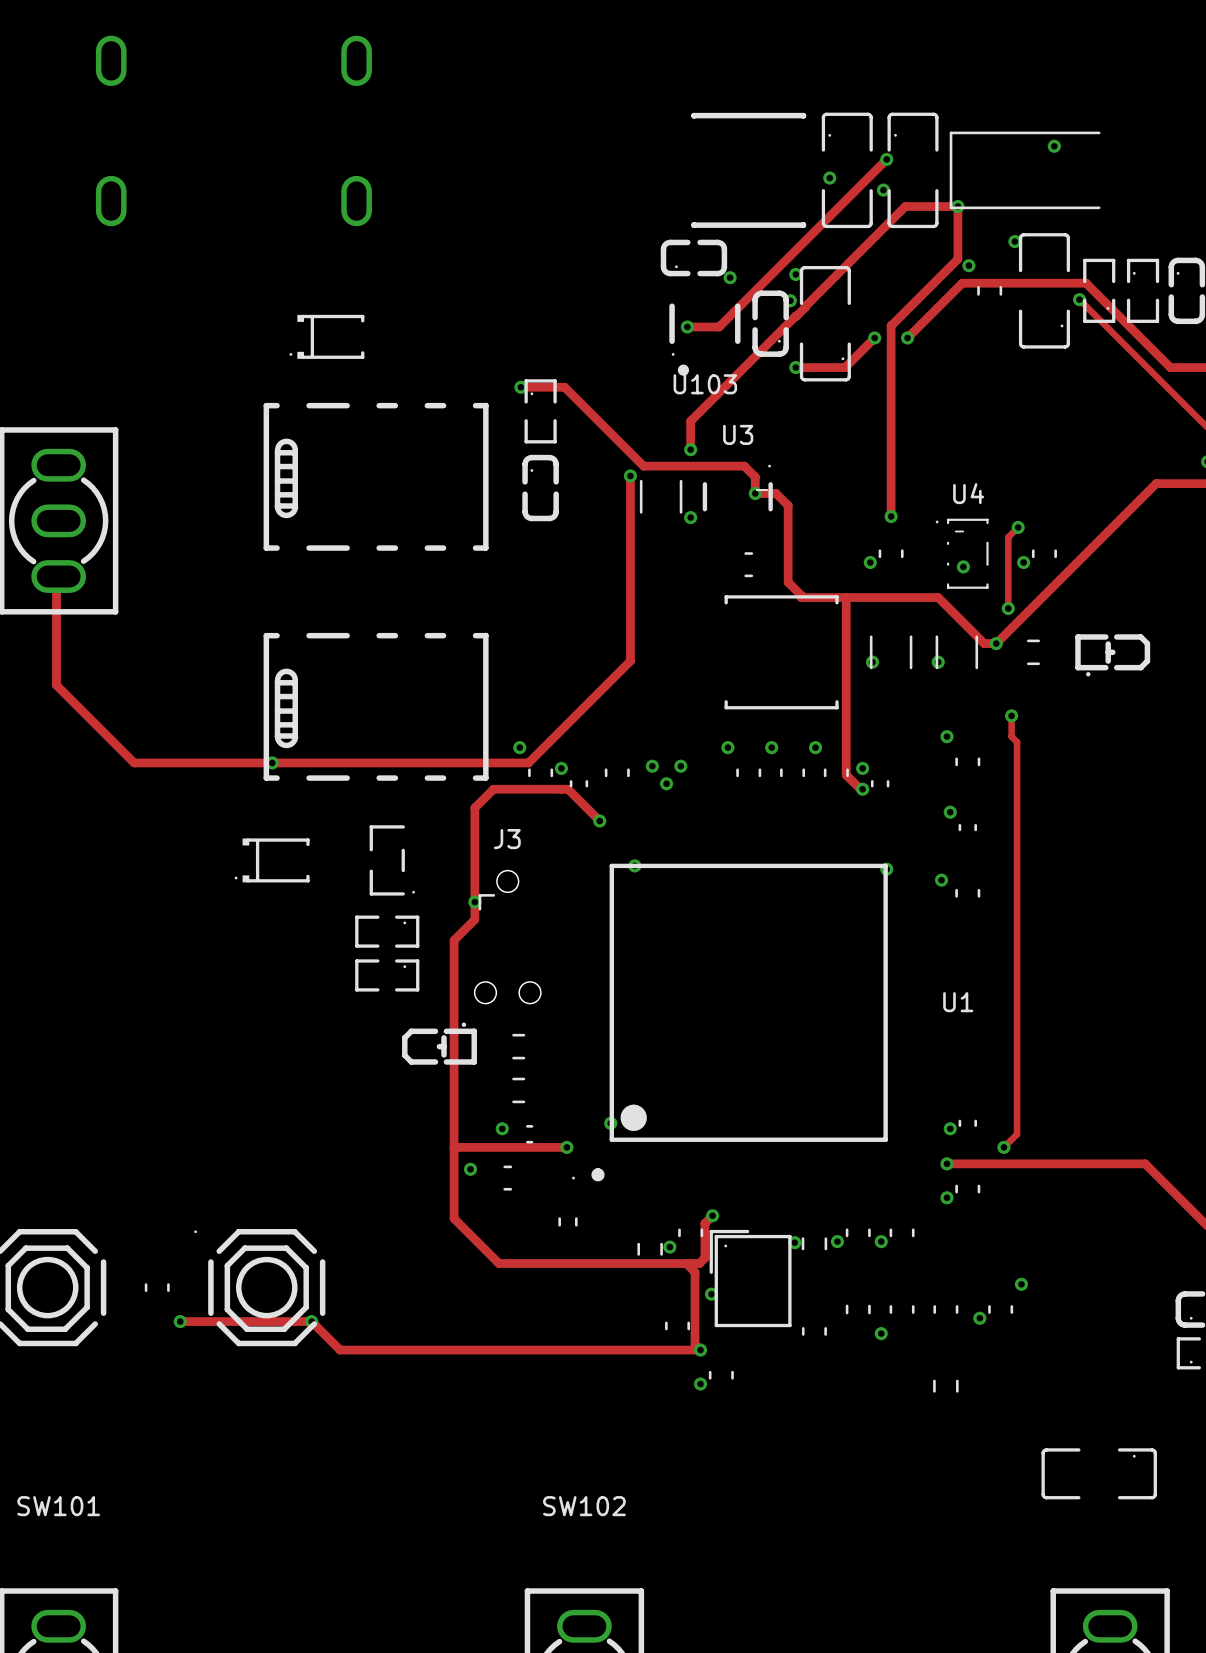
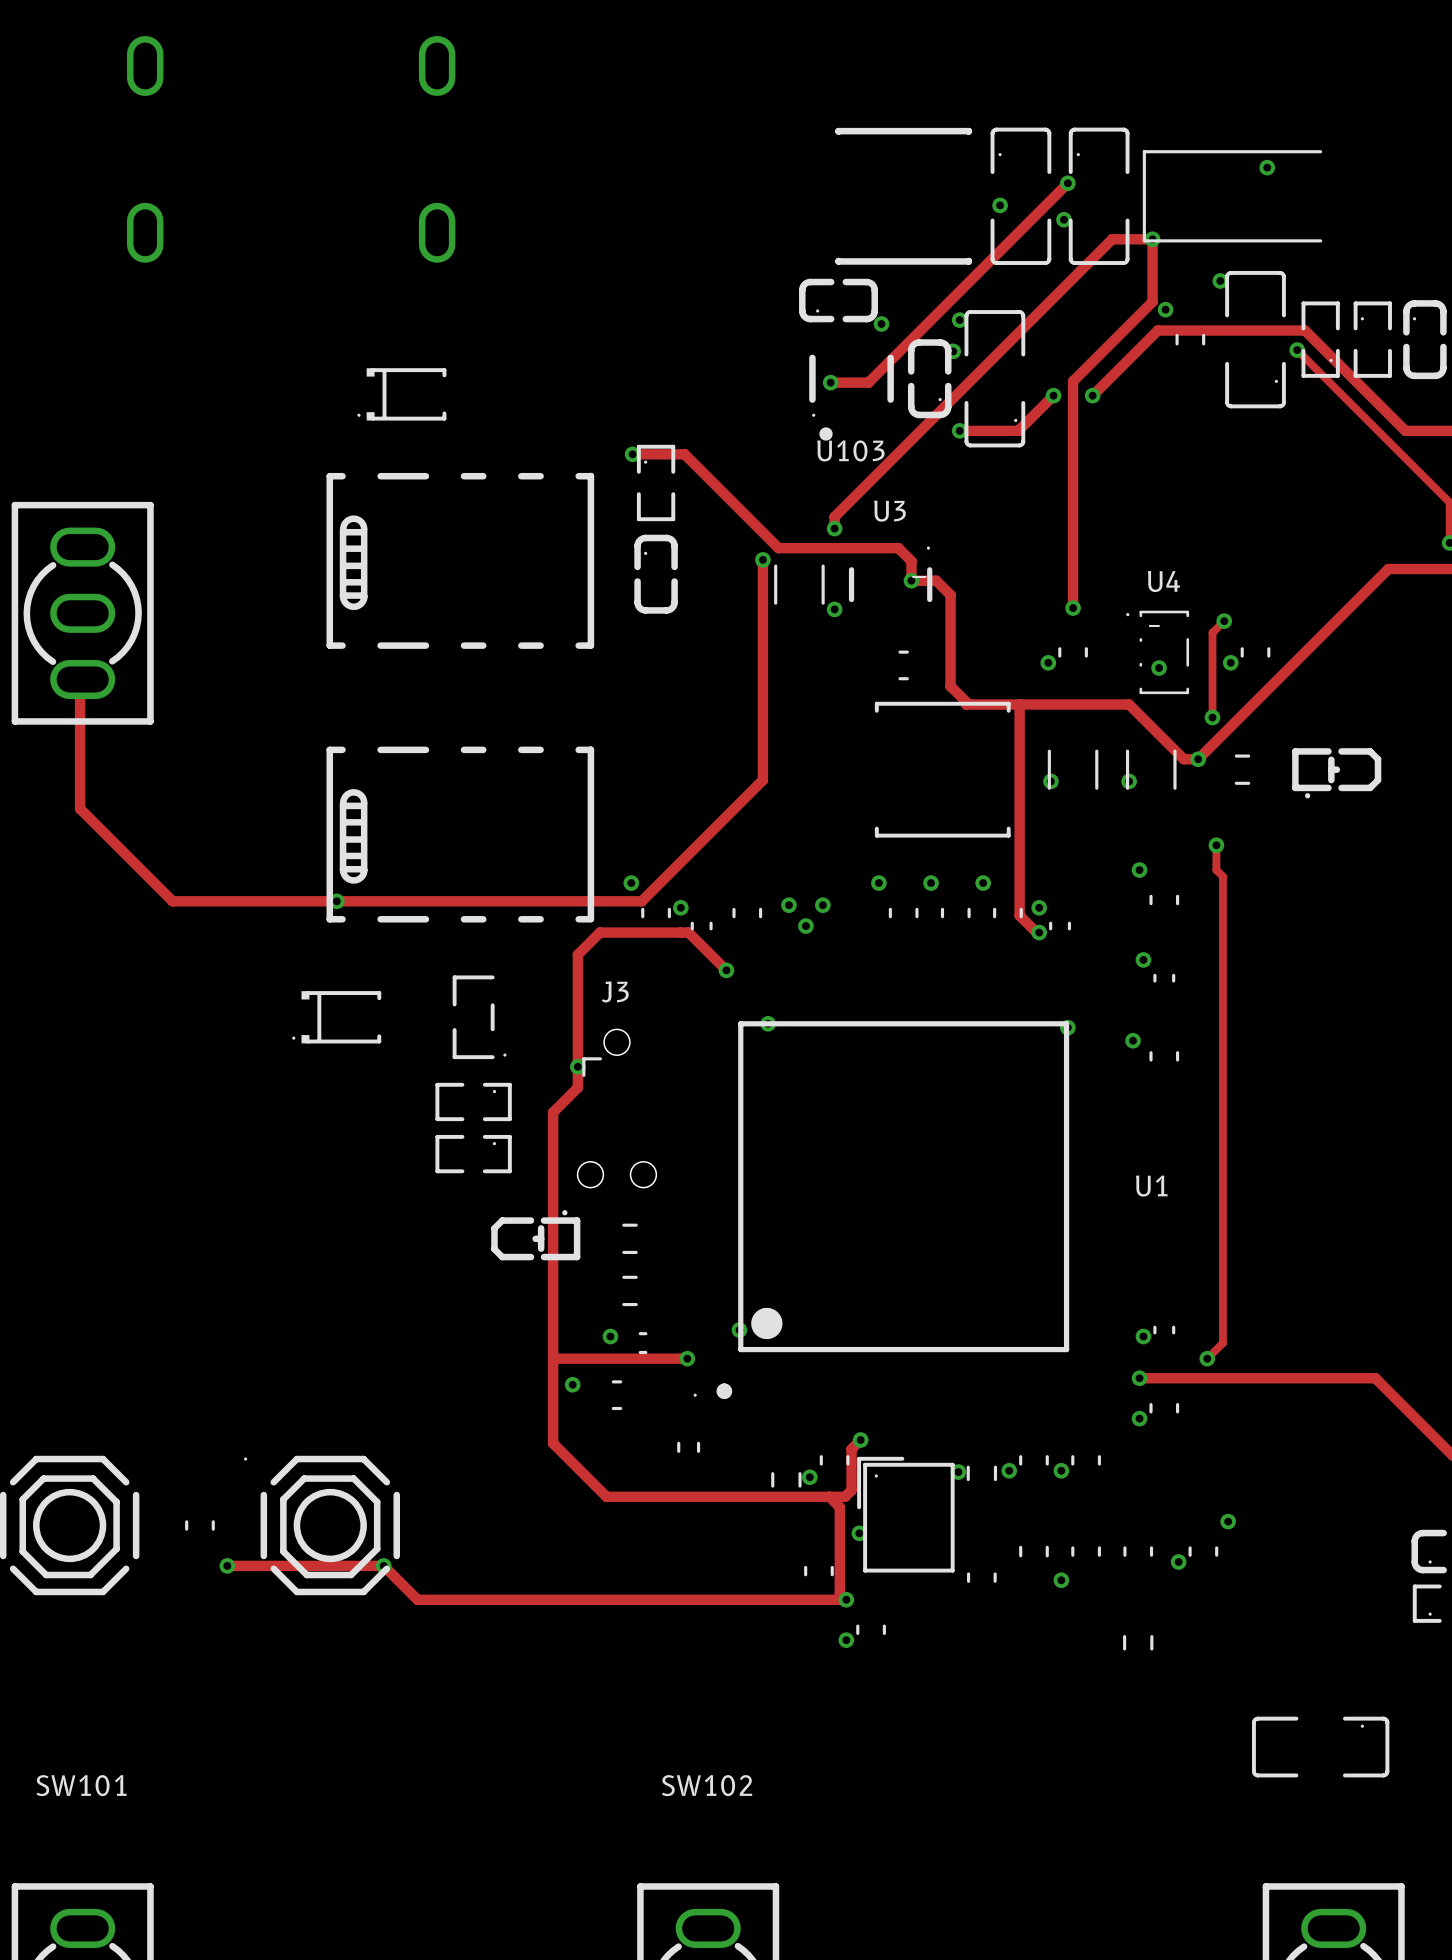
track: (923, 206) (905, 206) (805, 306) (690, 421) (690, 439) -> (1112, 239) (834, 516)

